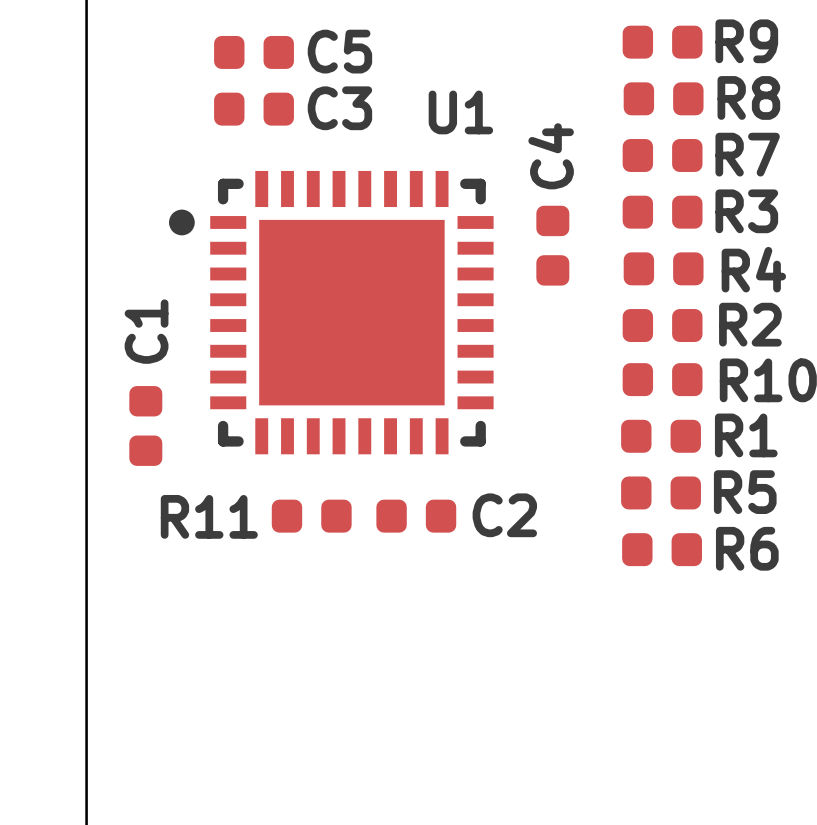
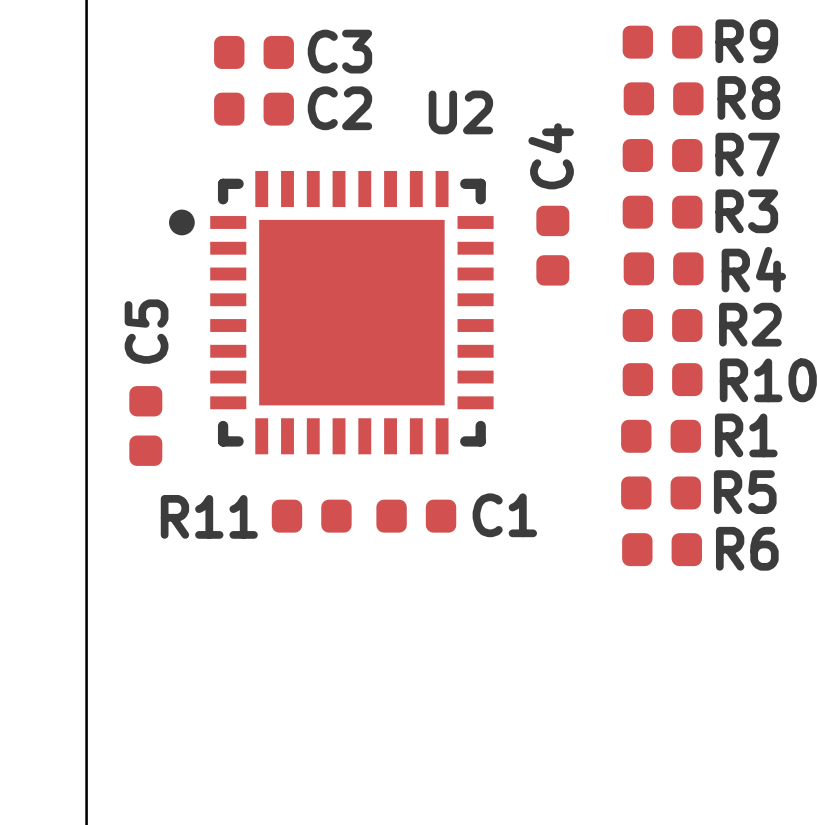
C5 name: C5 (339, 51) -> C3 (339, 51)
C3 name: C3 (339, 108) -> C2 (339, 108)
U1 name: U1 (460, 112) -> U2 (460, 112)
C1 name: C1 (146, 331) -> C5 (146, 331)
C2 name: C2 (504, 515) -> C1 (504, 515)

